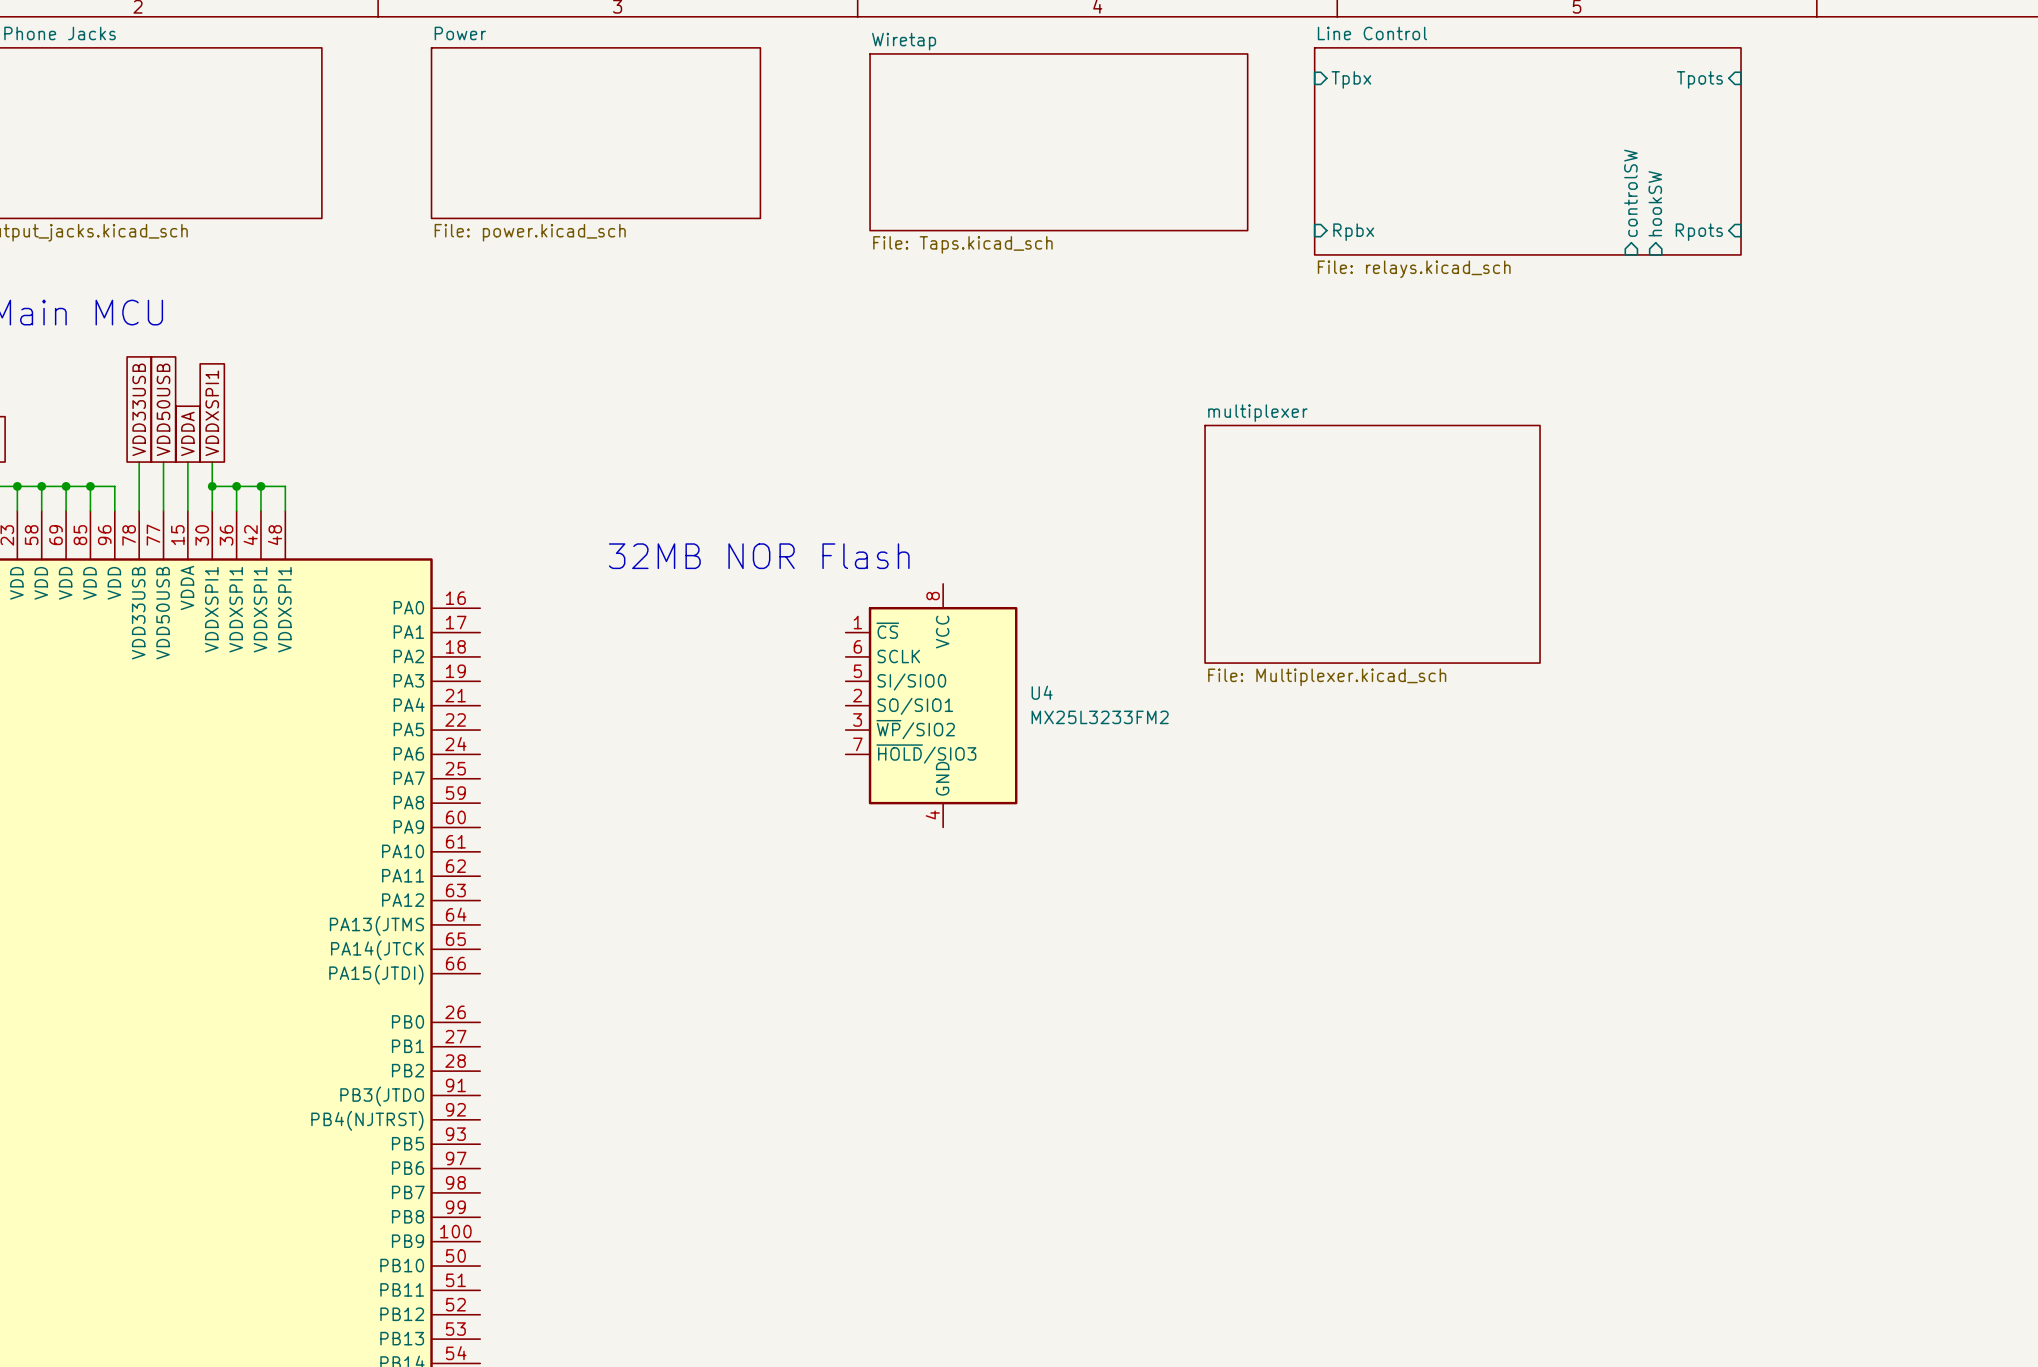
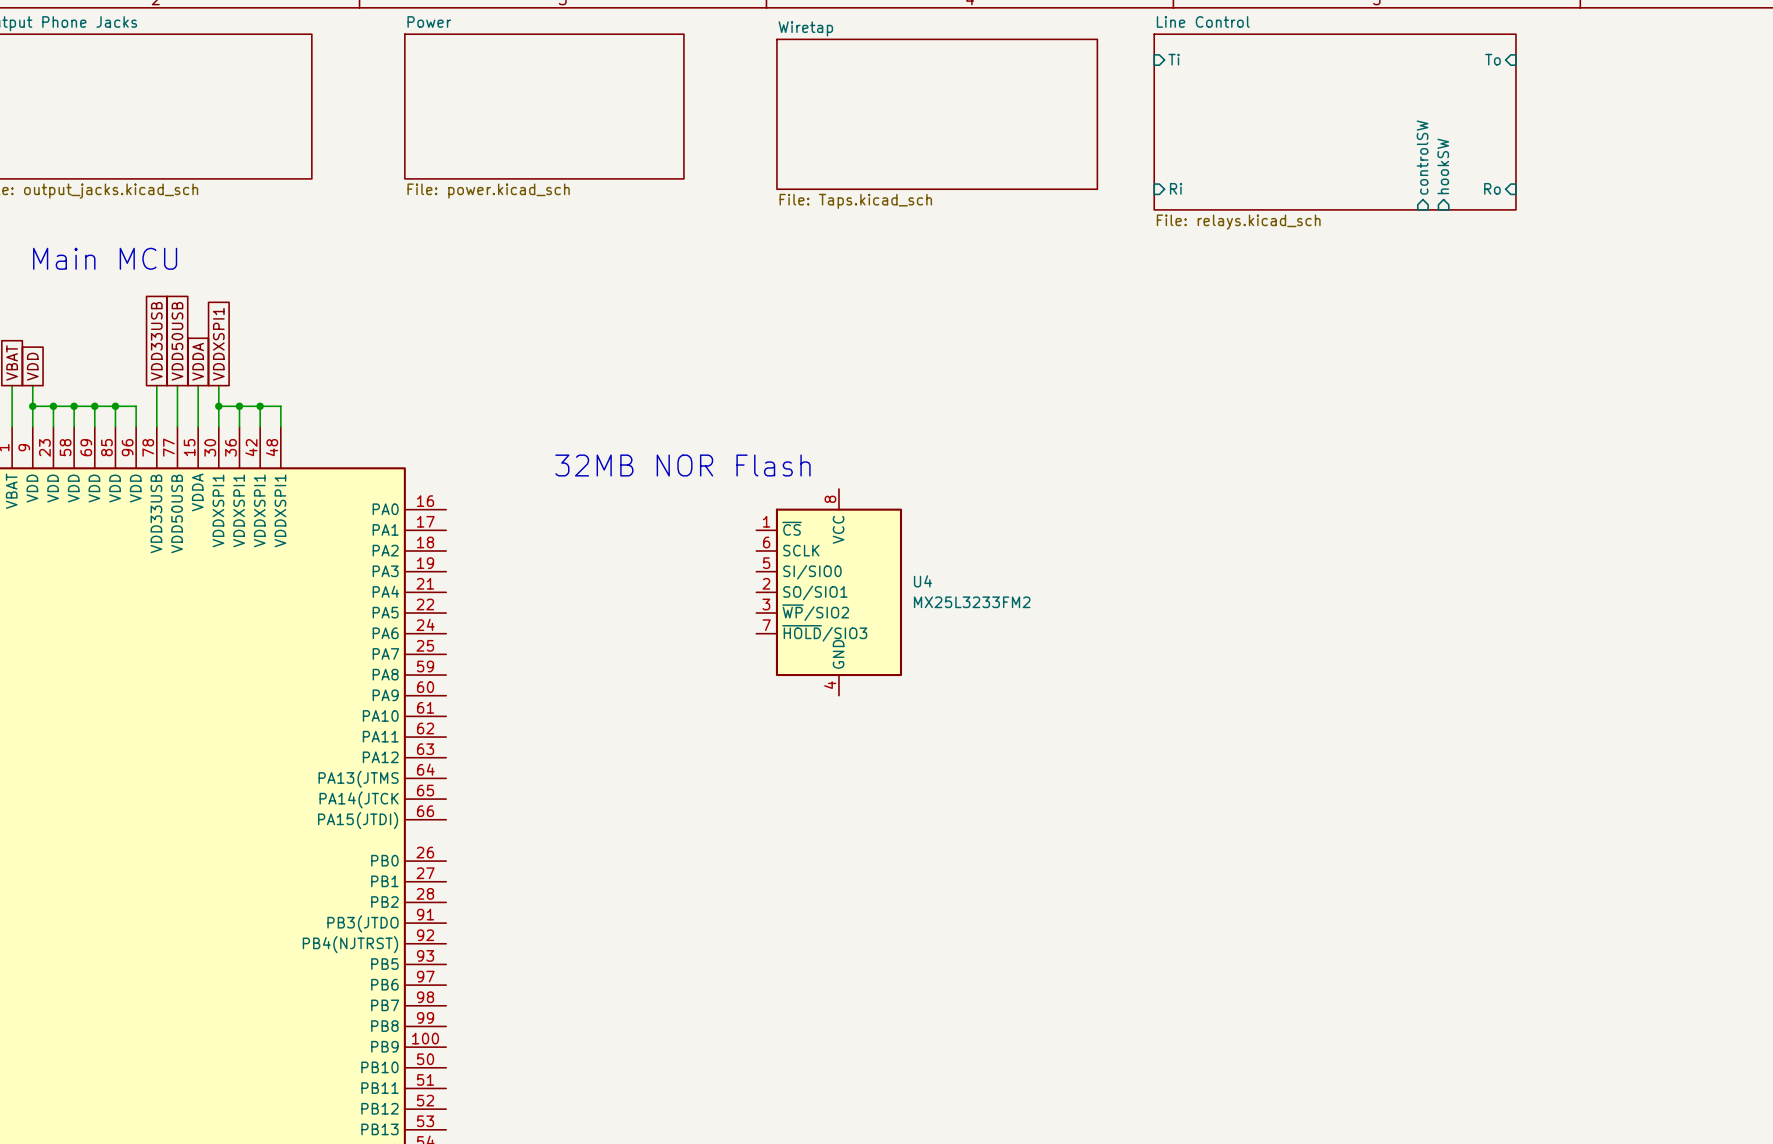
sheet pin: Tpbx (1351, 79) -> Ti (1174, 59)
sheet pin: Tpots (1699, 79) -> To (1492, 59)
sheet pin: Rpbx (1353, 232) -> Ri (1176, 188)
sheet pin: Rpots (1699, 232) -> Ro (1492, 188)
sheet multiplexer: File: Multiplexer.kicad_sch (1372, 544) -> none

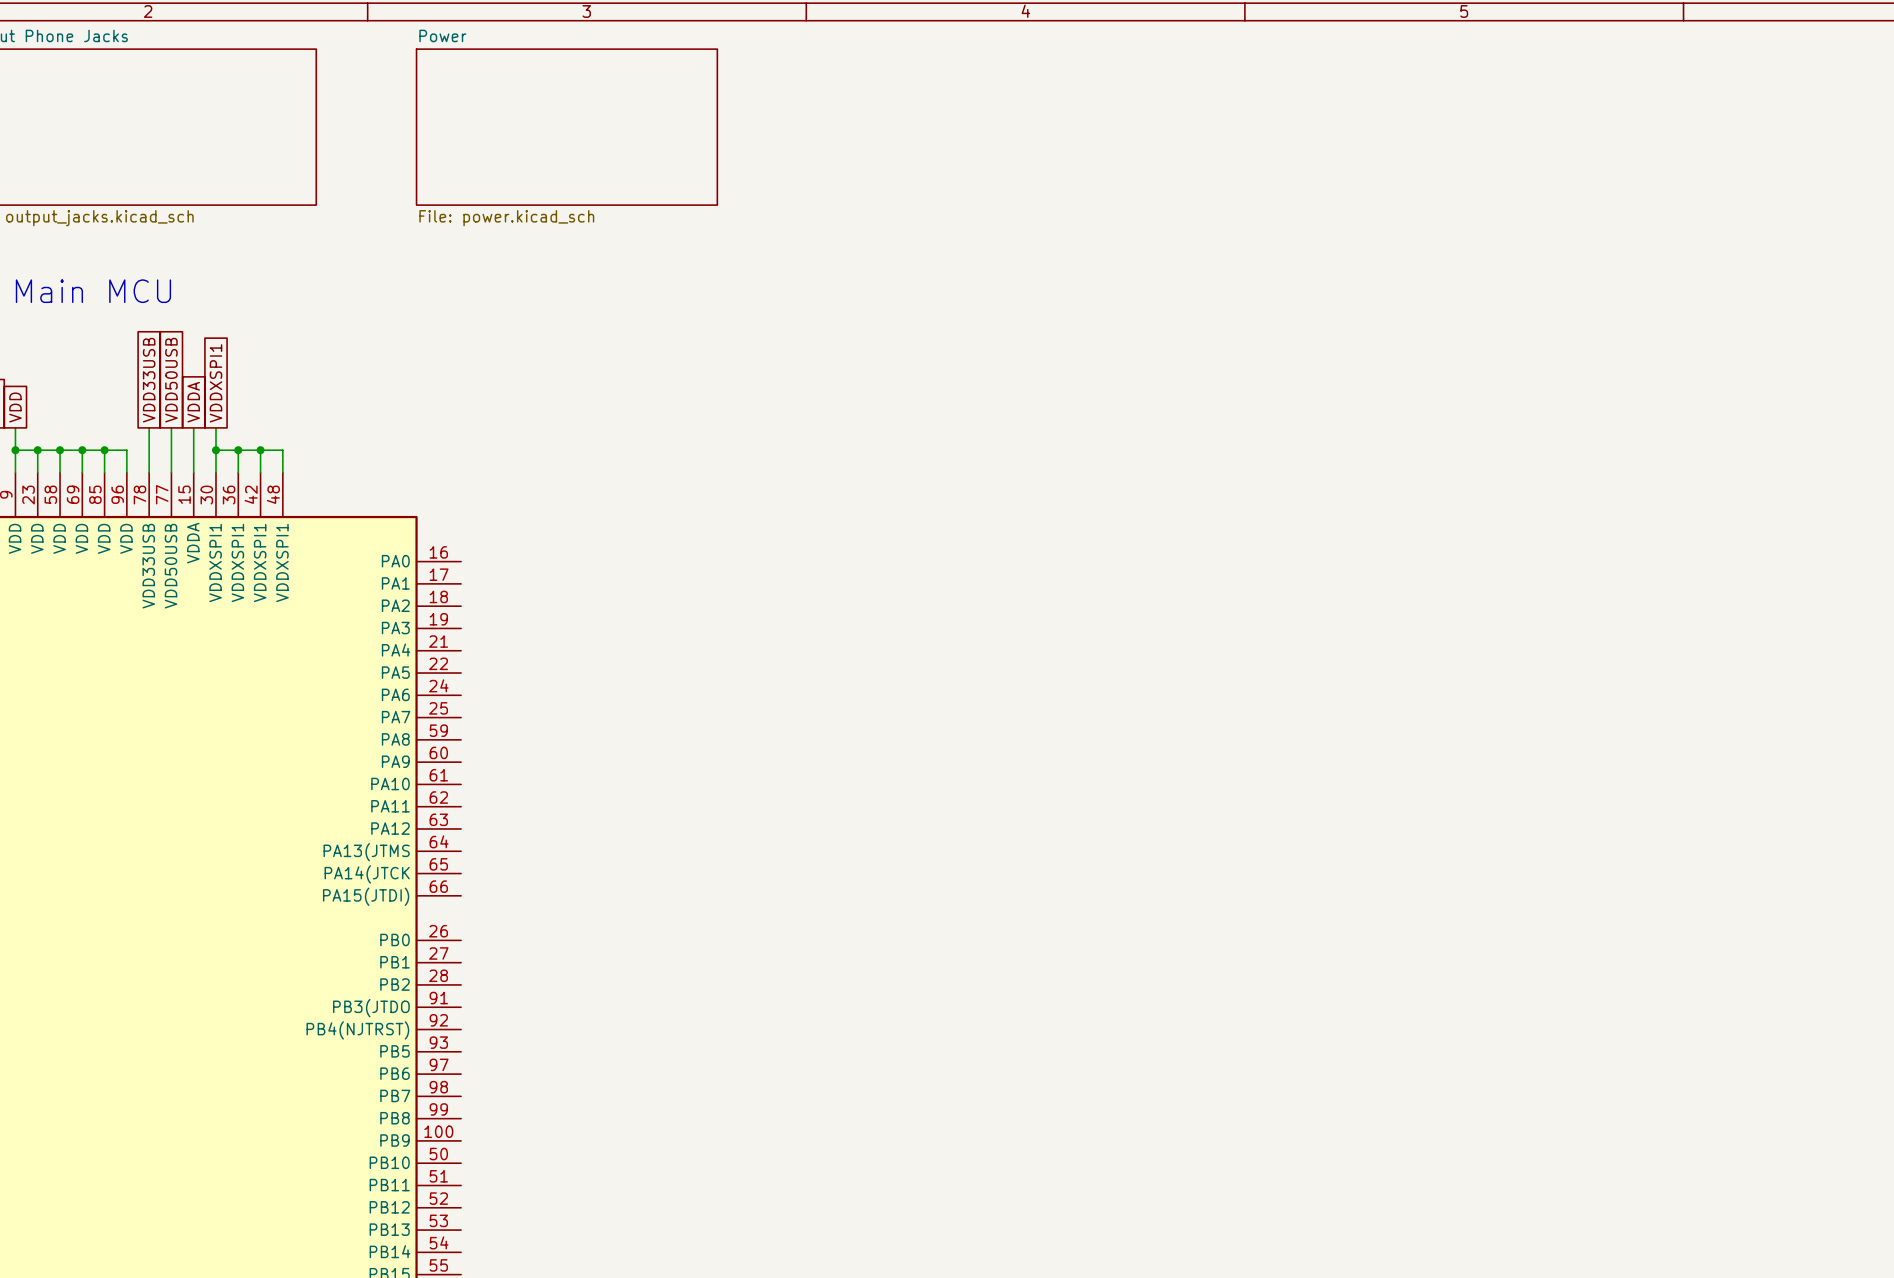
sheet pin: Ti (1174, 59) -> none
sheet pin: To (1492, 59) -> none
sheet Wiretap: File: Taps.kicad_sch (937, 114) -> none
sheet Line Control: File: relays.kicad_sch (1335, 122) -> none
sheet pin: controlSW (1422, 157) -> none
sheet pin: hookSW (1443, 166) -> none
sheet pin: Ri (1176, 188) -> none
sheet pin: Ro (1492, 188) -> none
text: 32MB NOR Flash (682, 465) -> none
U4: MX25L3233FM2 (829, 592) -> none

